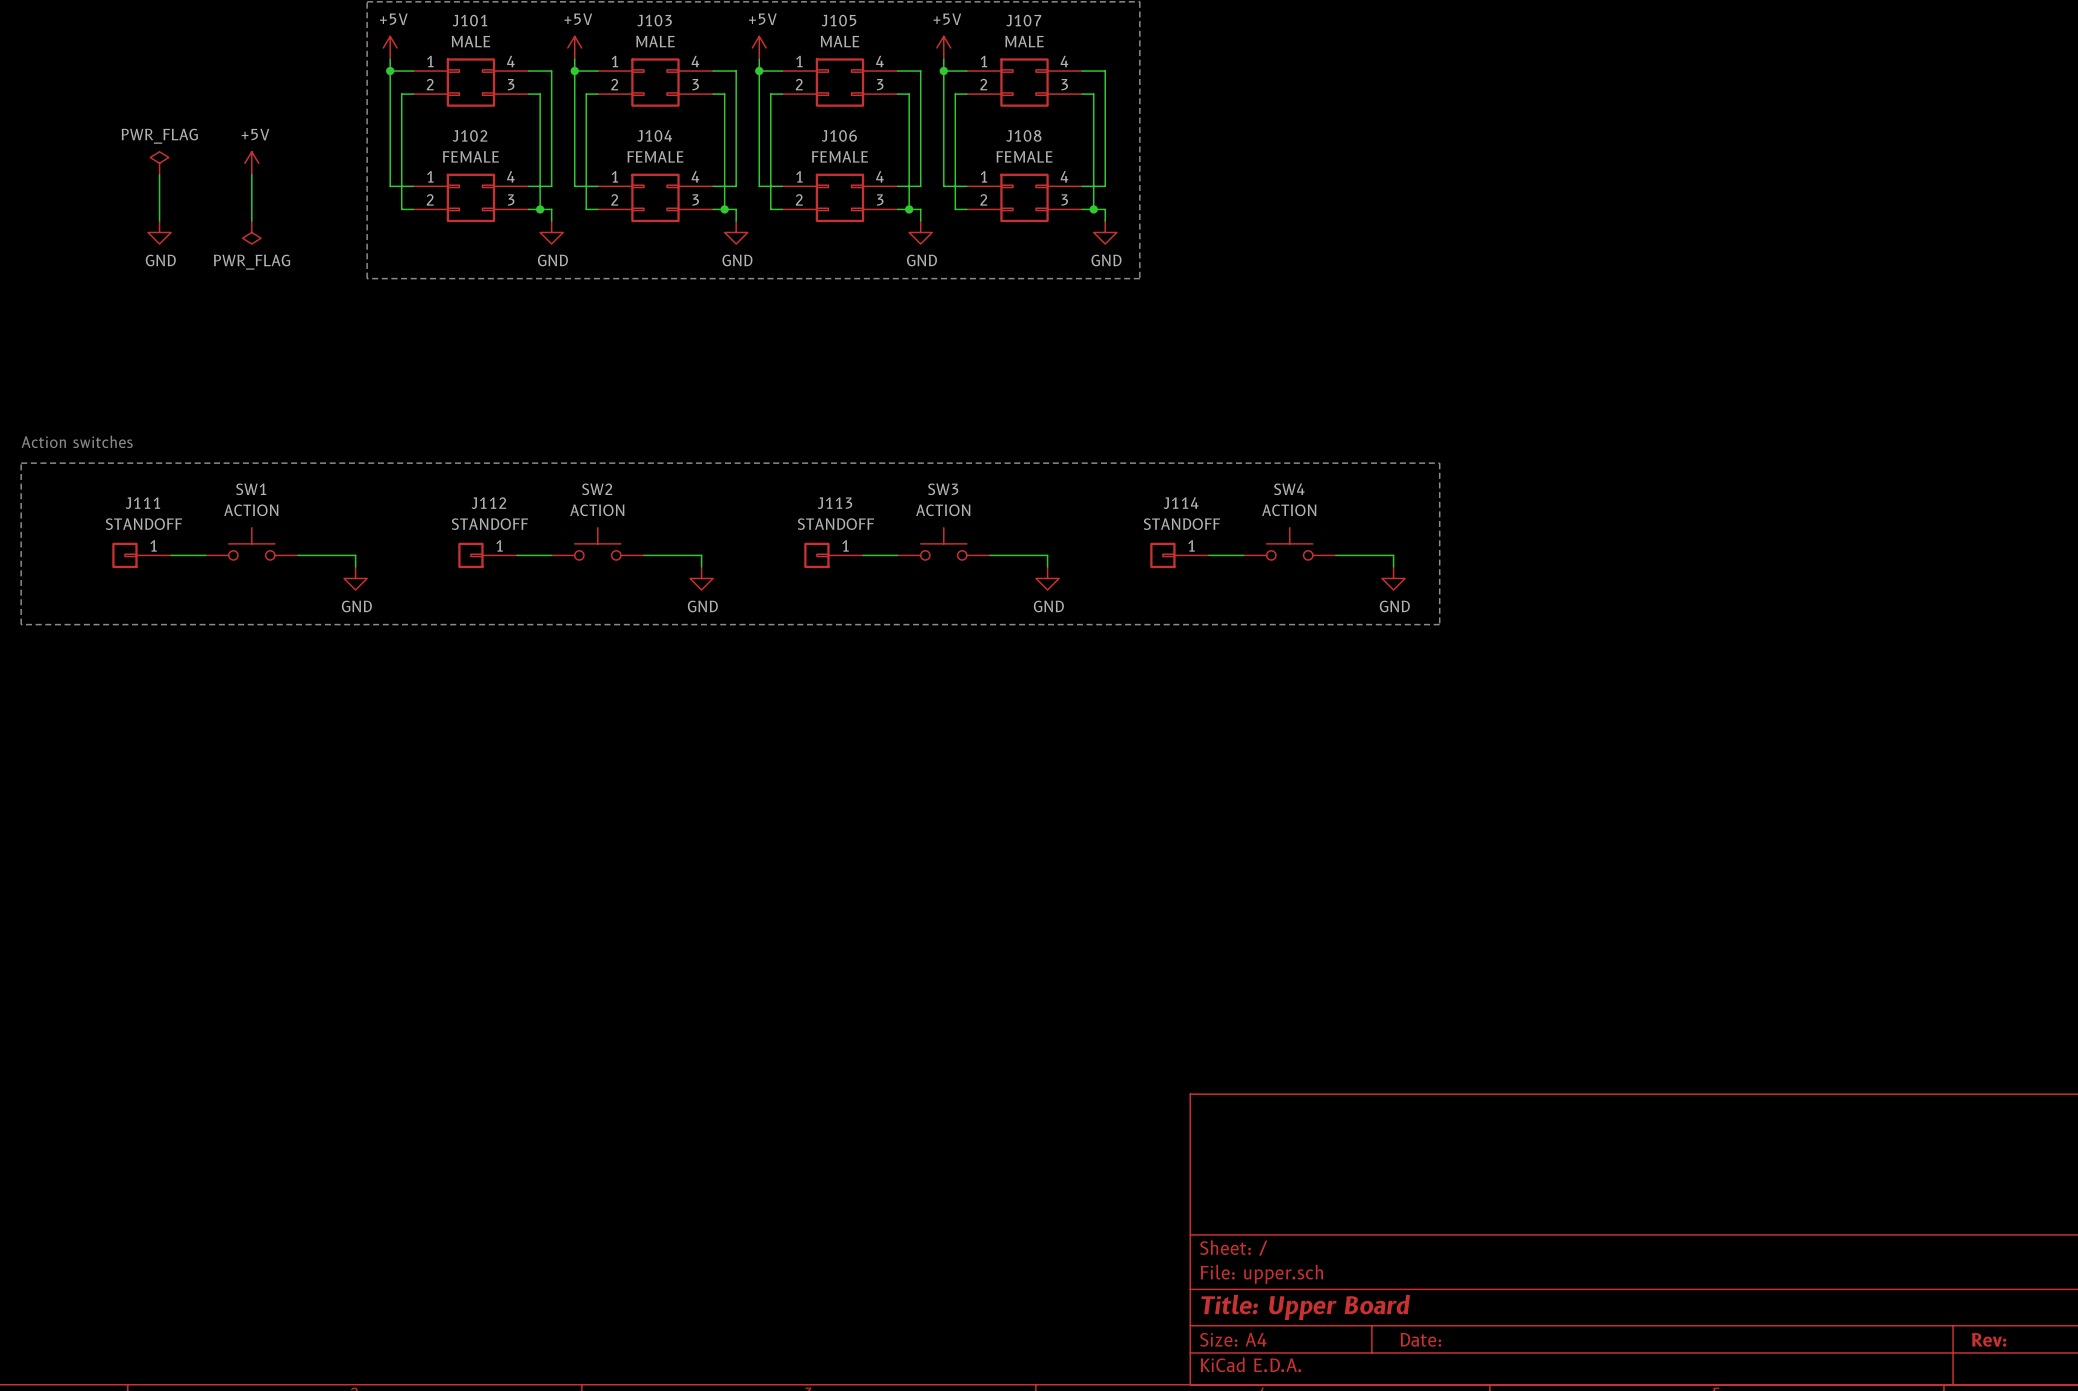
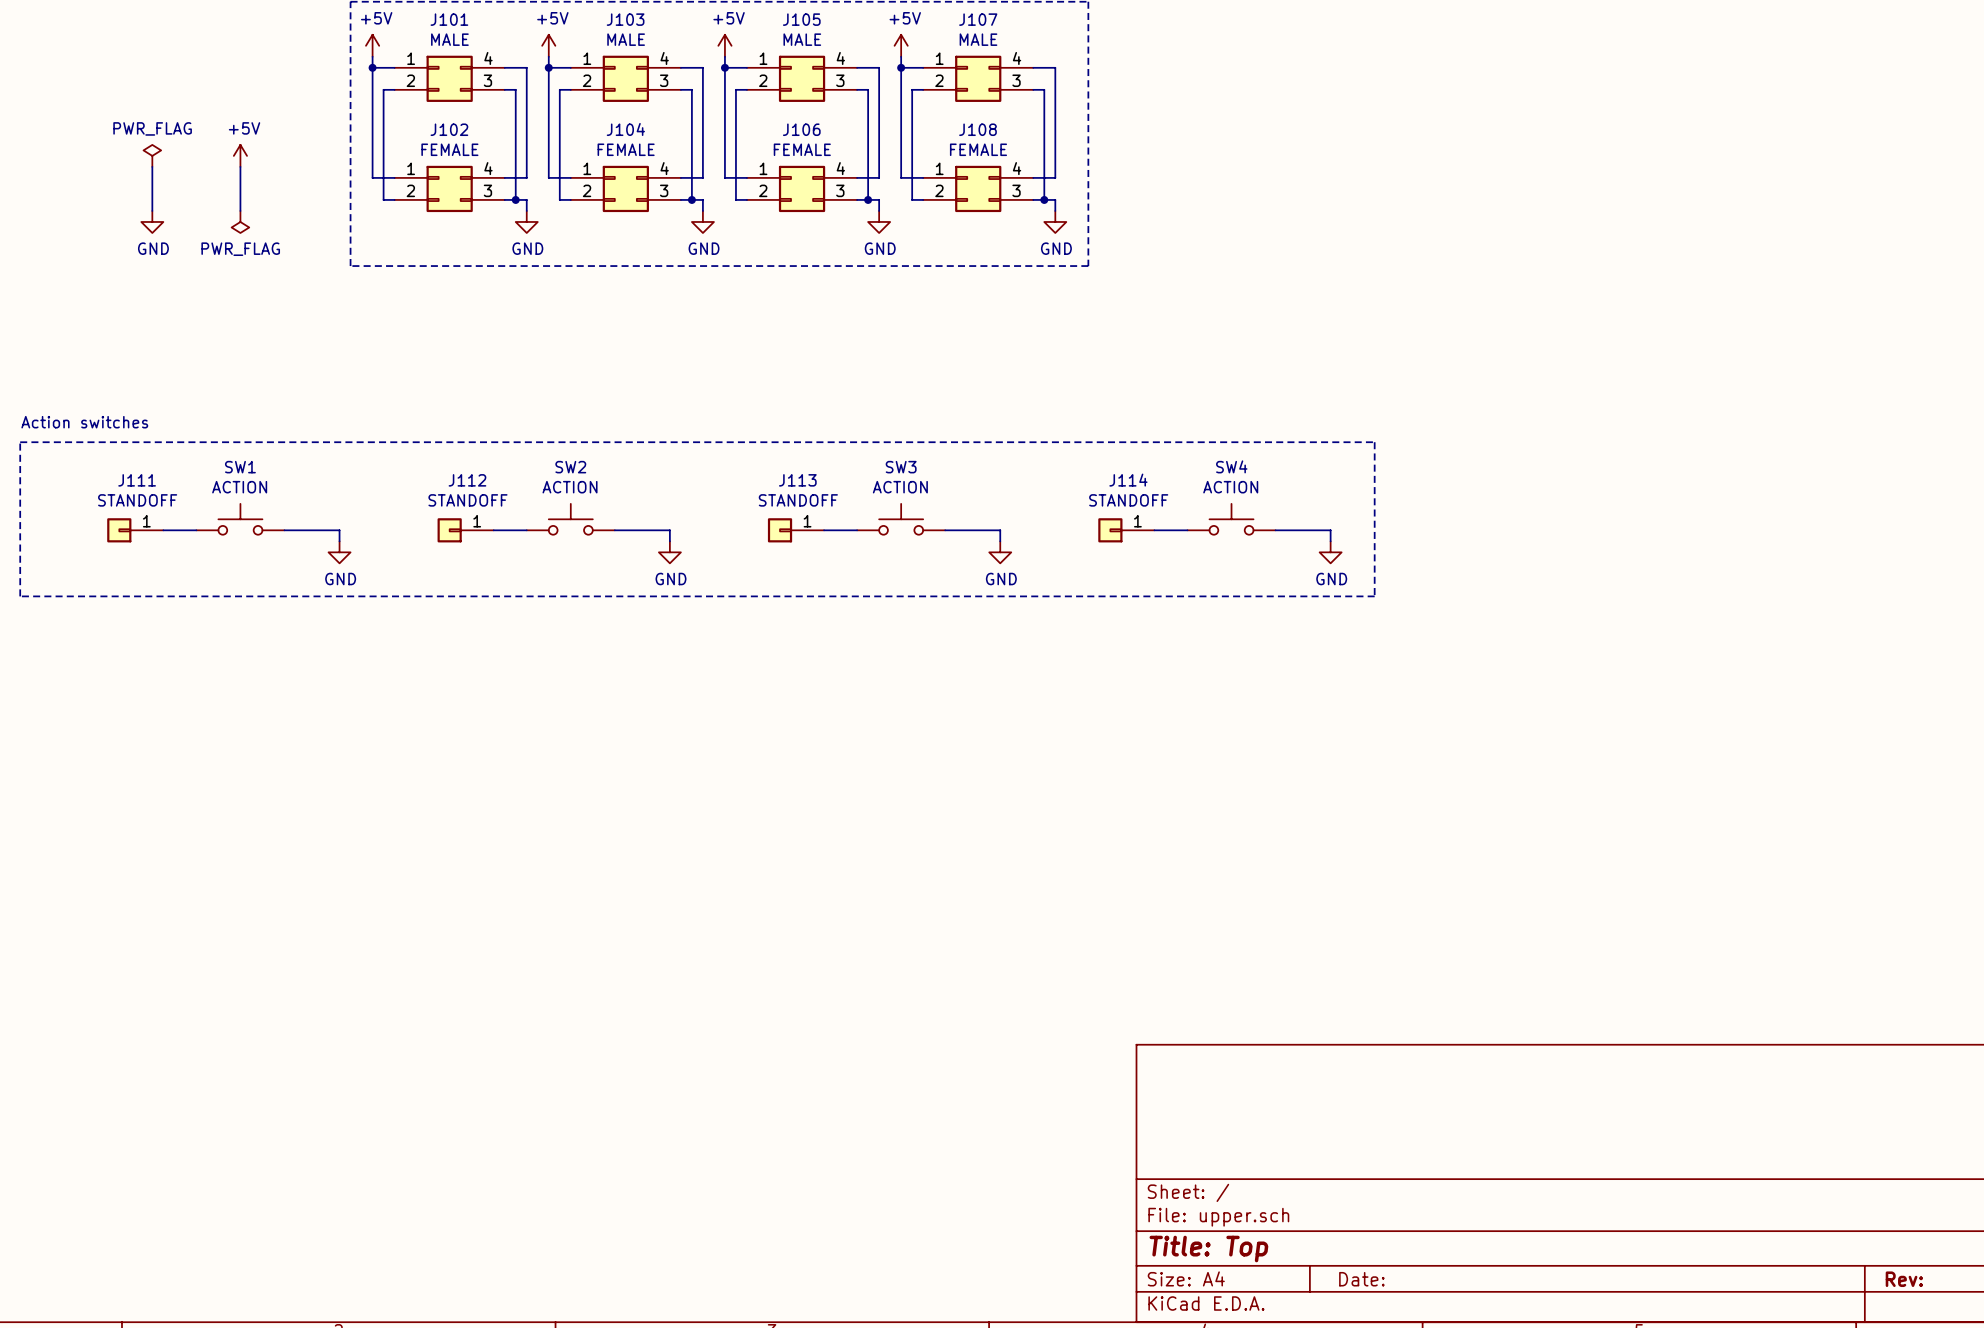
title block: Title: Upper Board (1305, 1307) -> Title: Top (1208, 1249)

